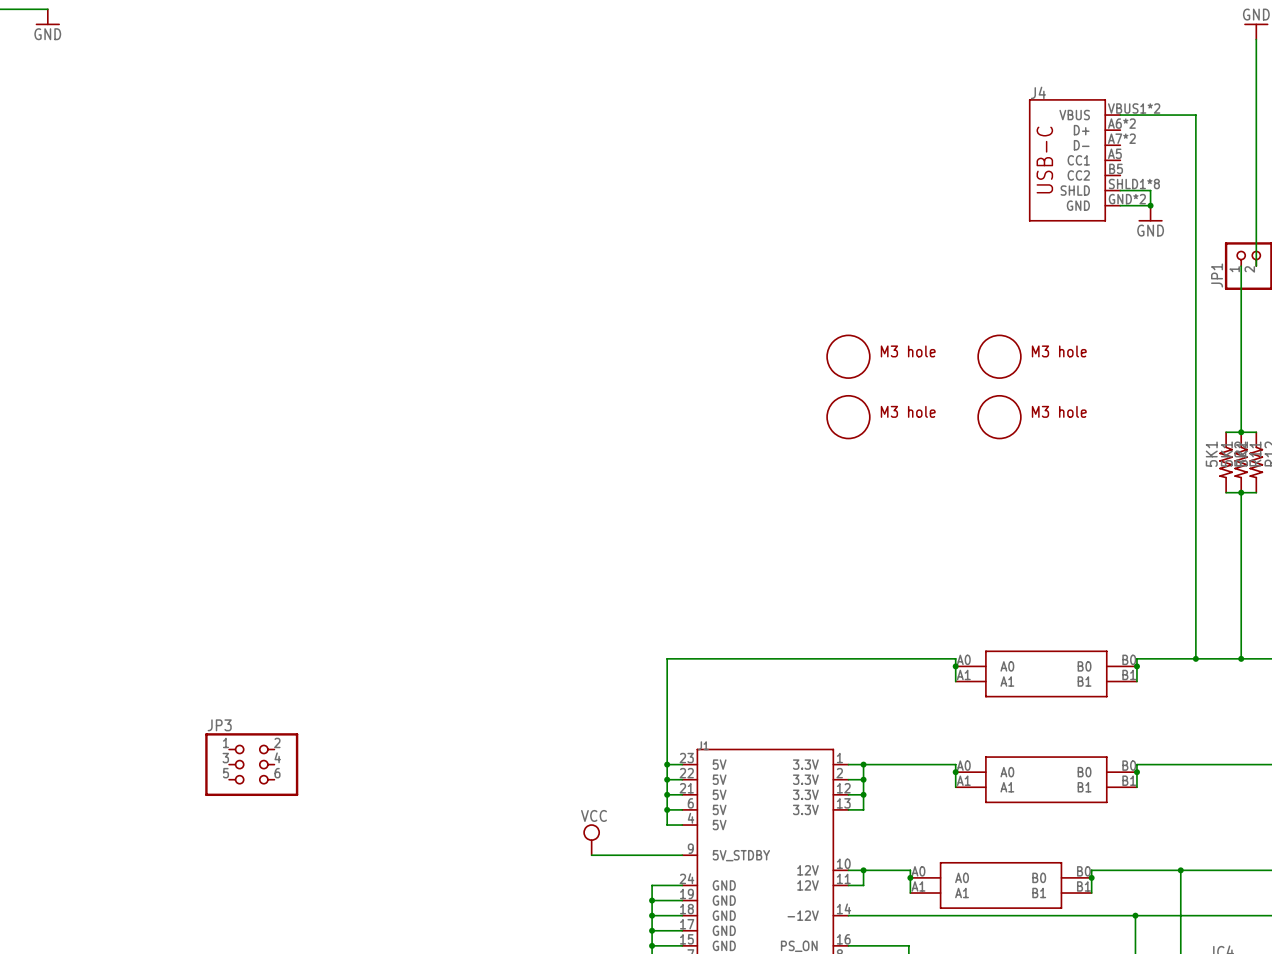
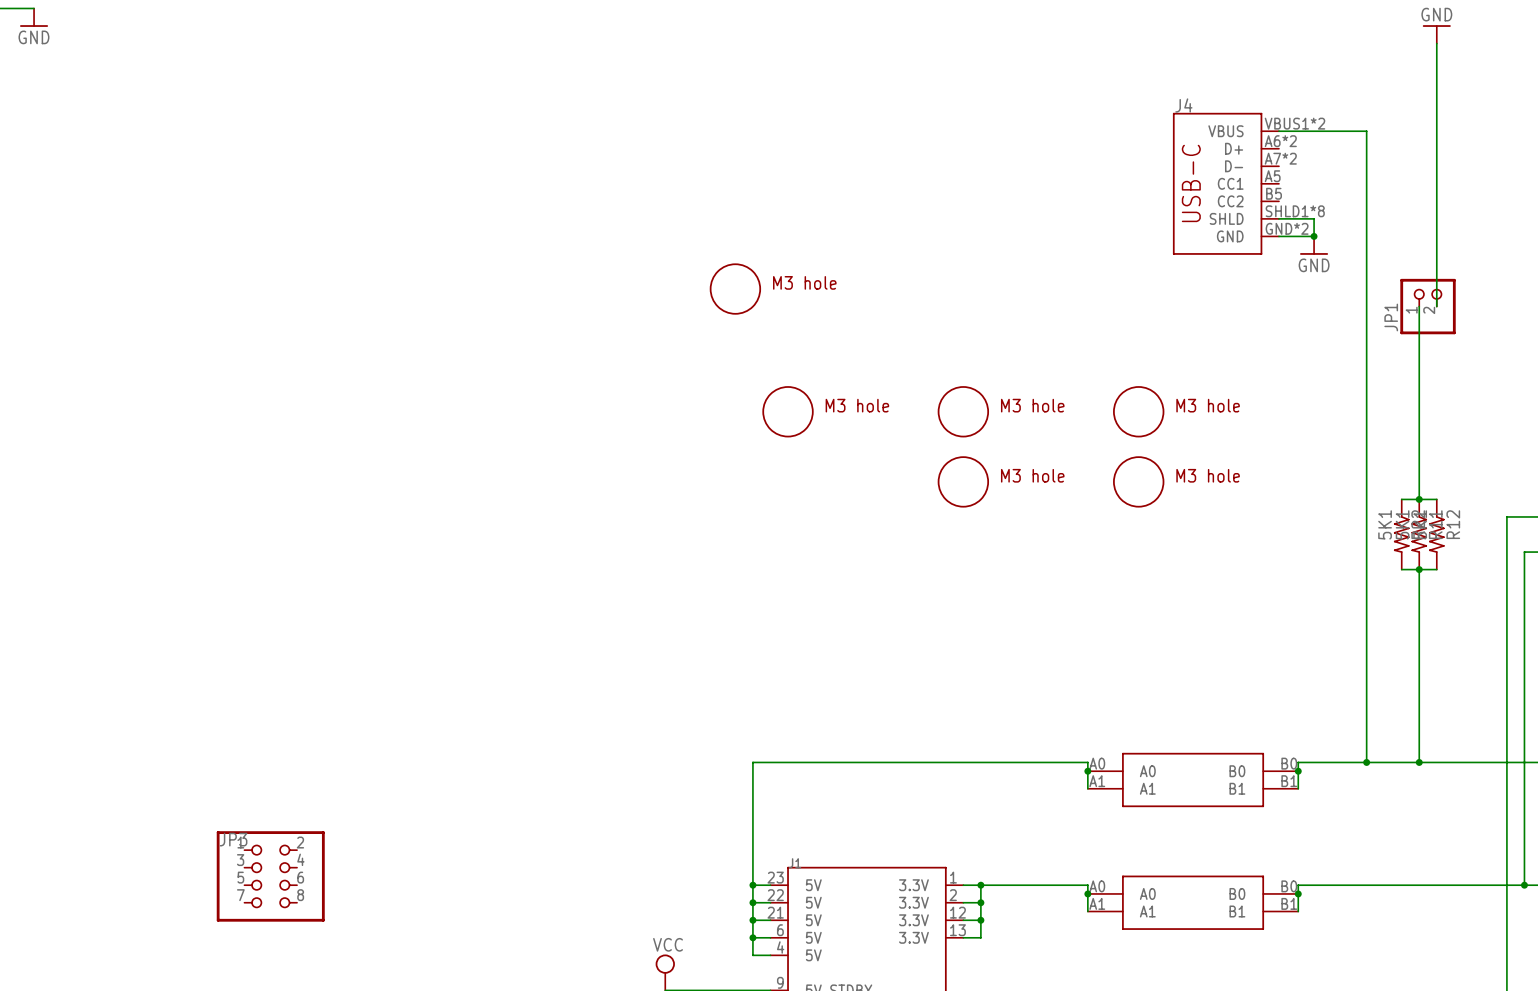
part: none -> (735, 289)
part: none -> (788, 411)
JP3 symbol: [205, 733, 299, 797] -> [216, 831, 325, 922]

